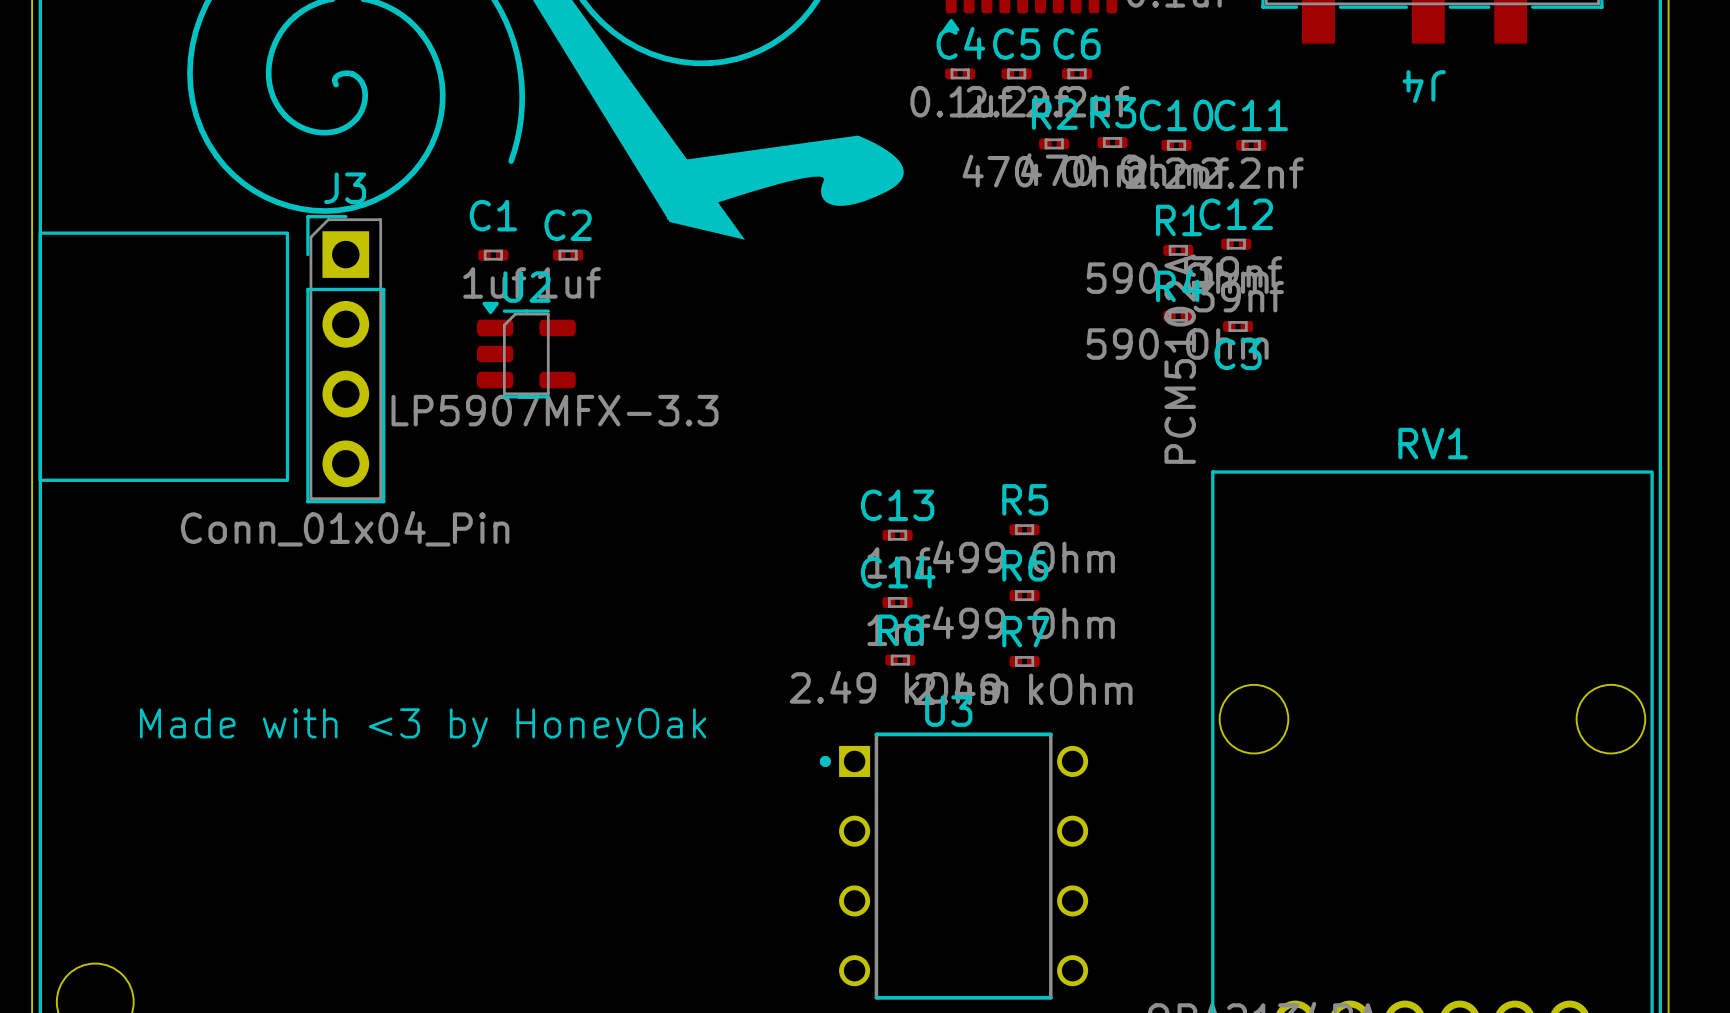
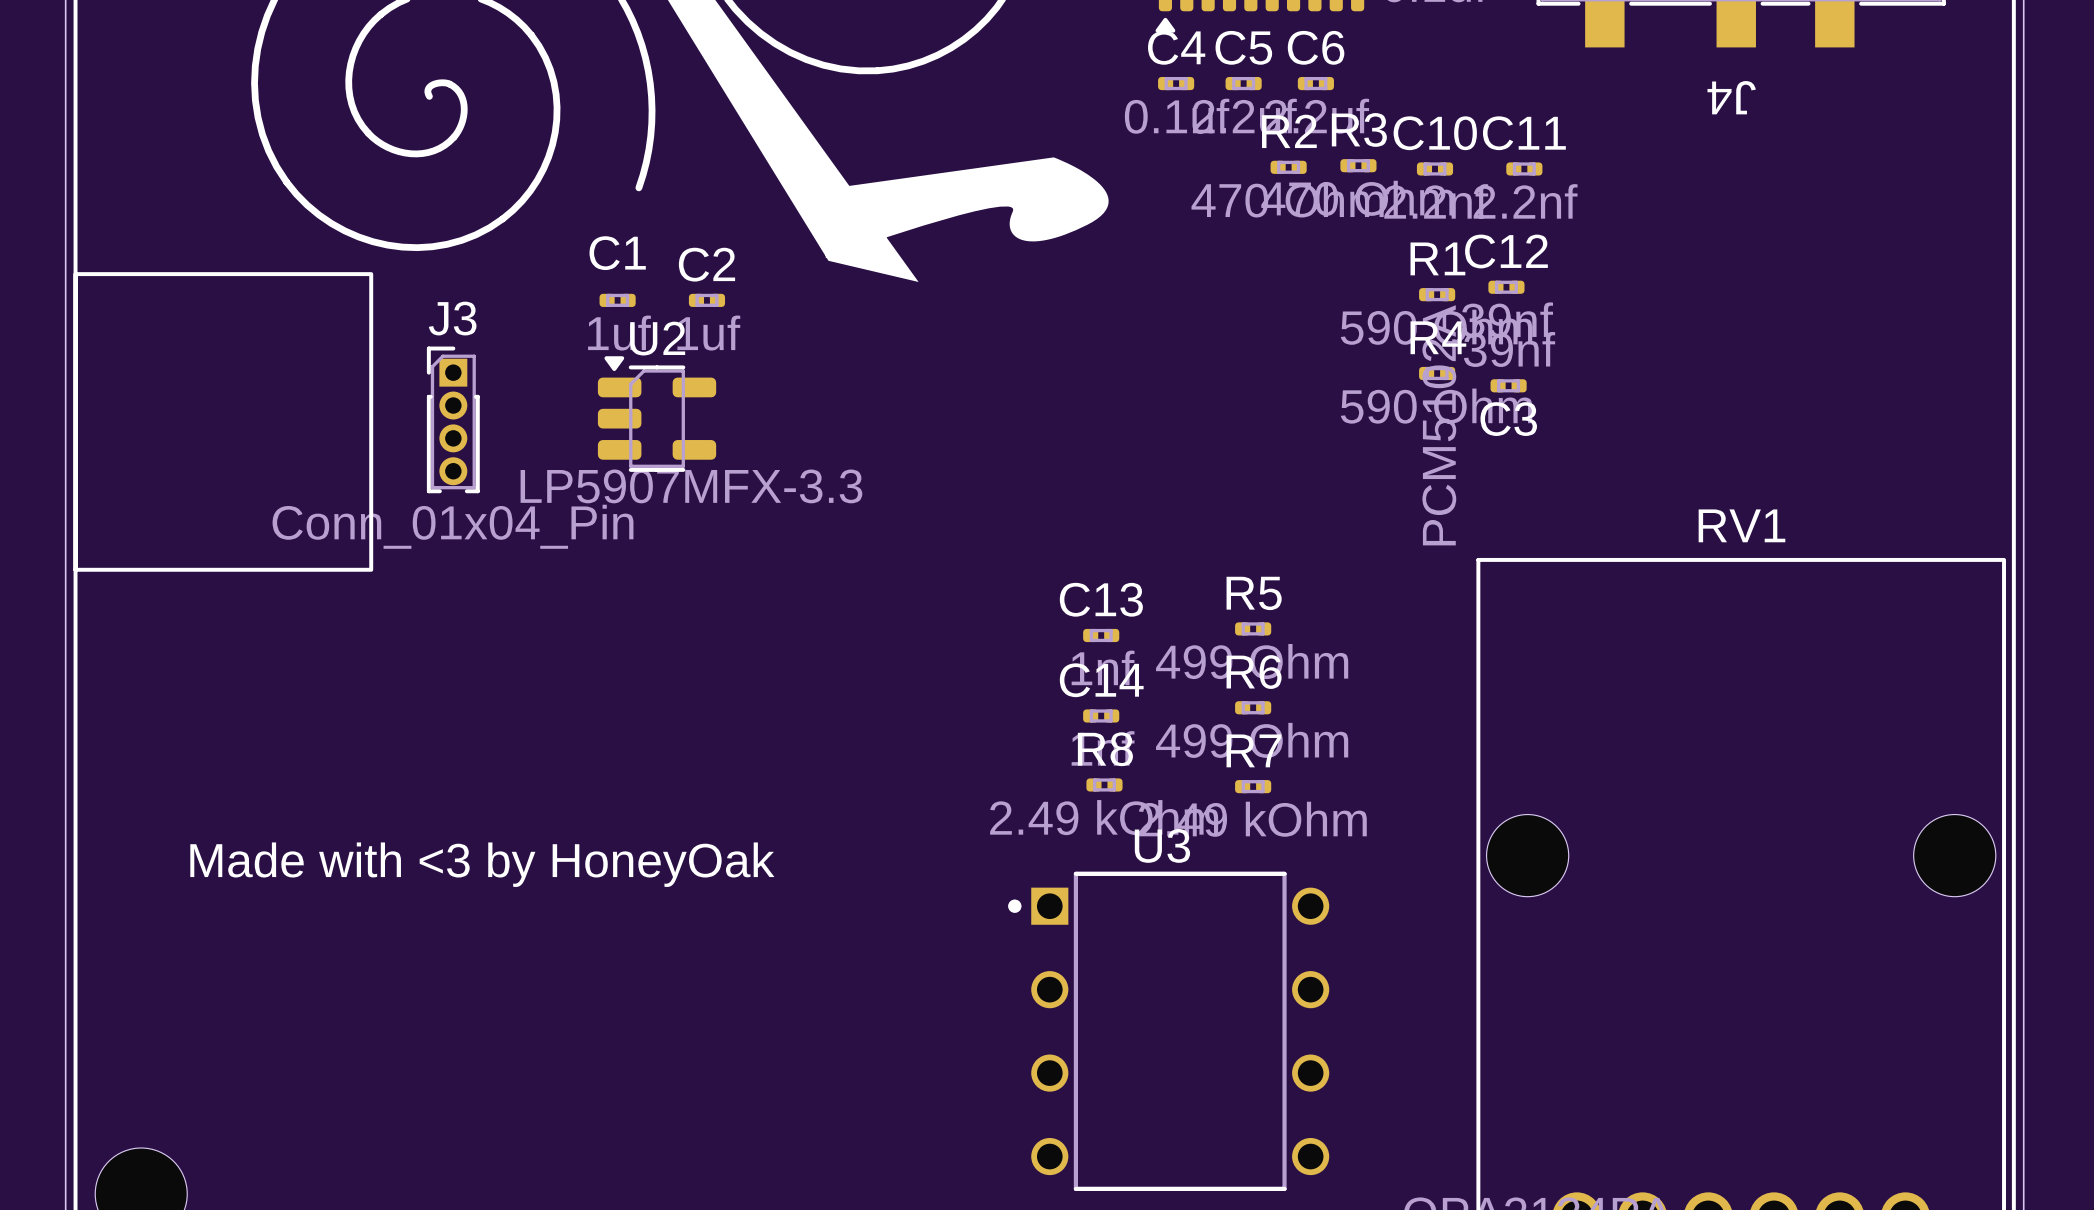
J3 name position: J3 (345, 188) -> J3 (452, 318)
J3 footprint: [306, 215, 386, 504] -> [426, 346, 480, 494]
J3 value position: Conn_01x04_Pin (345, 528) -> Conn_01x04_Pin (453, 526)

